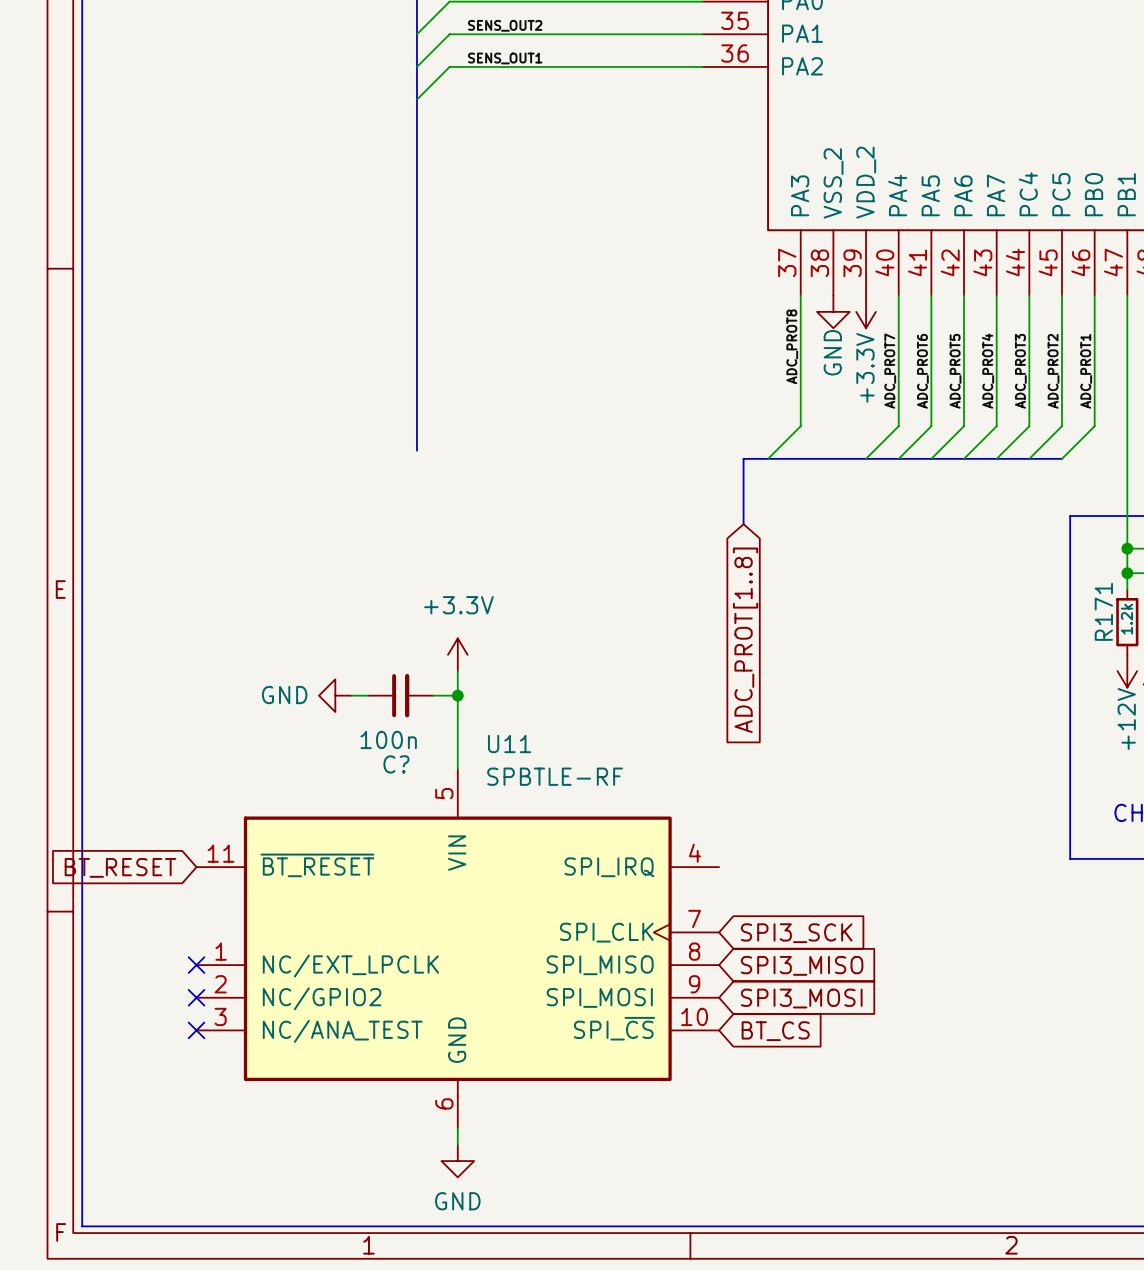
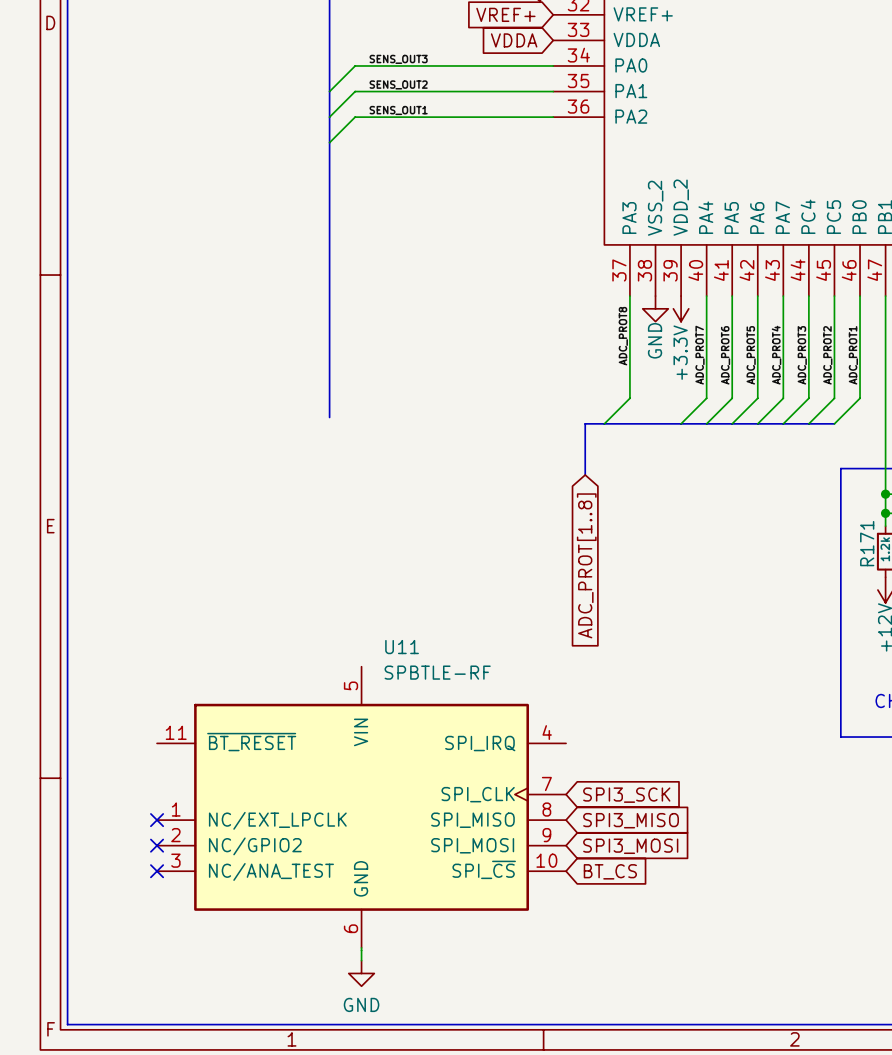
power symbol: +3.3V (457, 654) -> none
wire: (457, 671) (457, 769) -> none
power symbol: GND (335, 695) -> none
wire: (351, 695) (367, 695) -> none
C?: 100n (400, 695) -> none
wire: (433, 695) (457, 695) -> none
junction: (457, 695) -> none
global label: BT_RESET (120, 867) -> none

